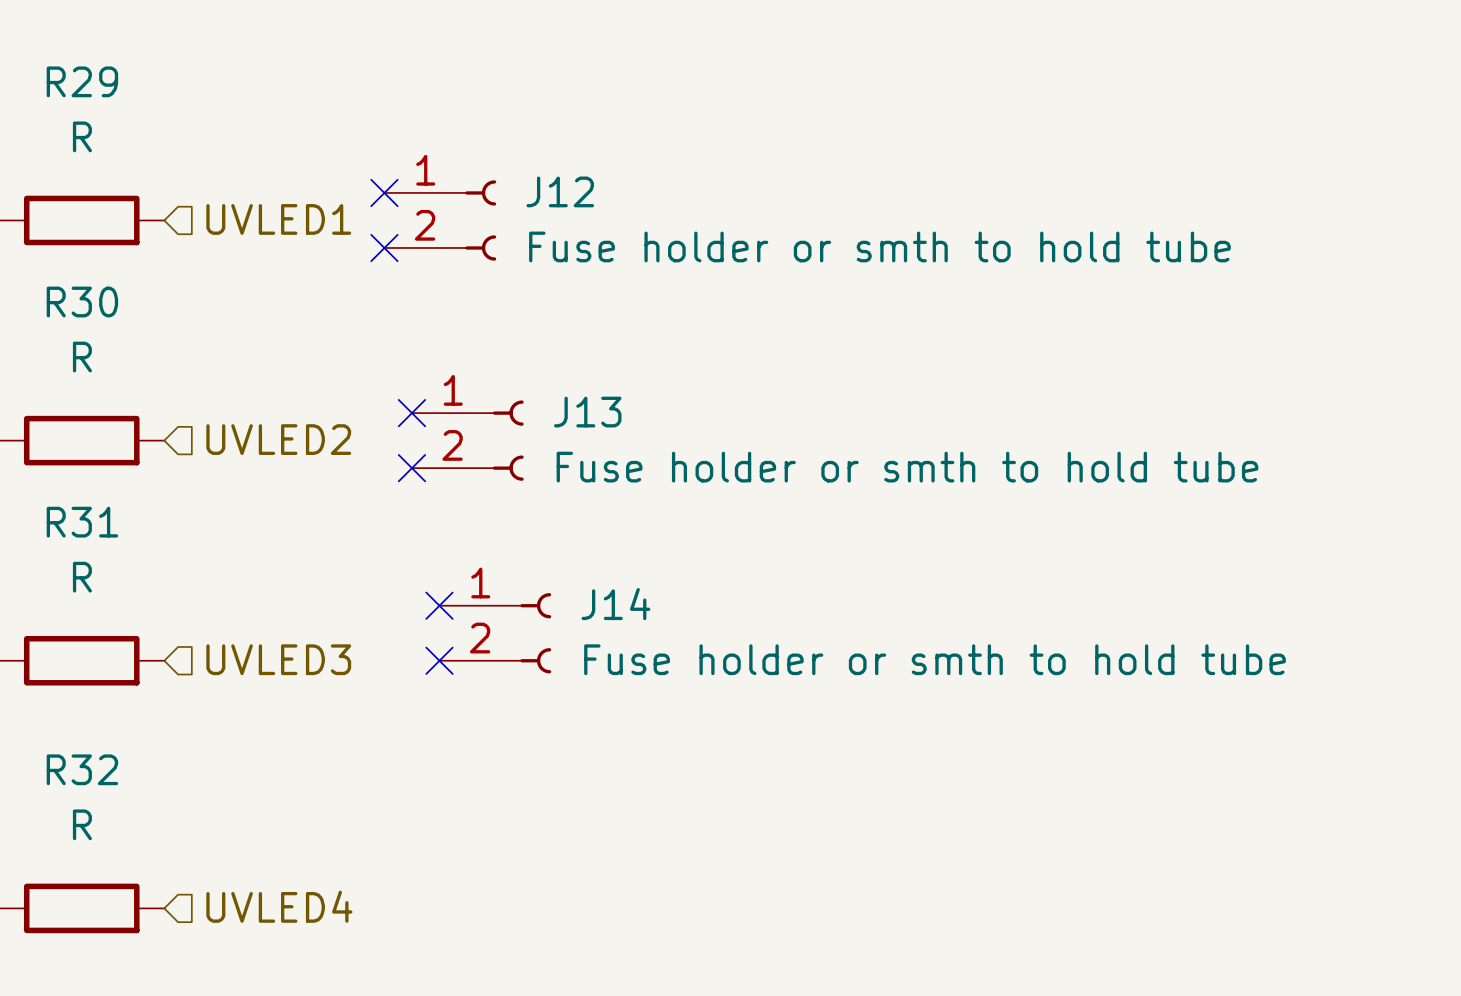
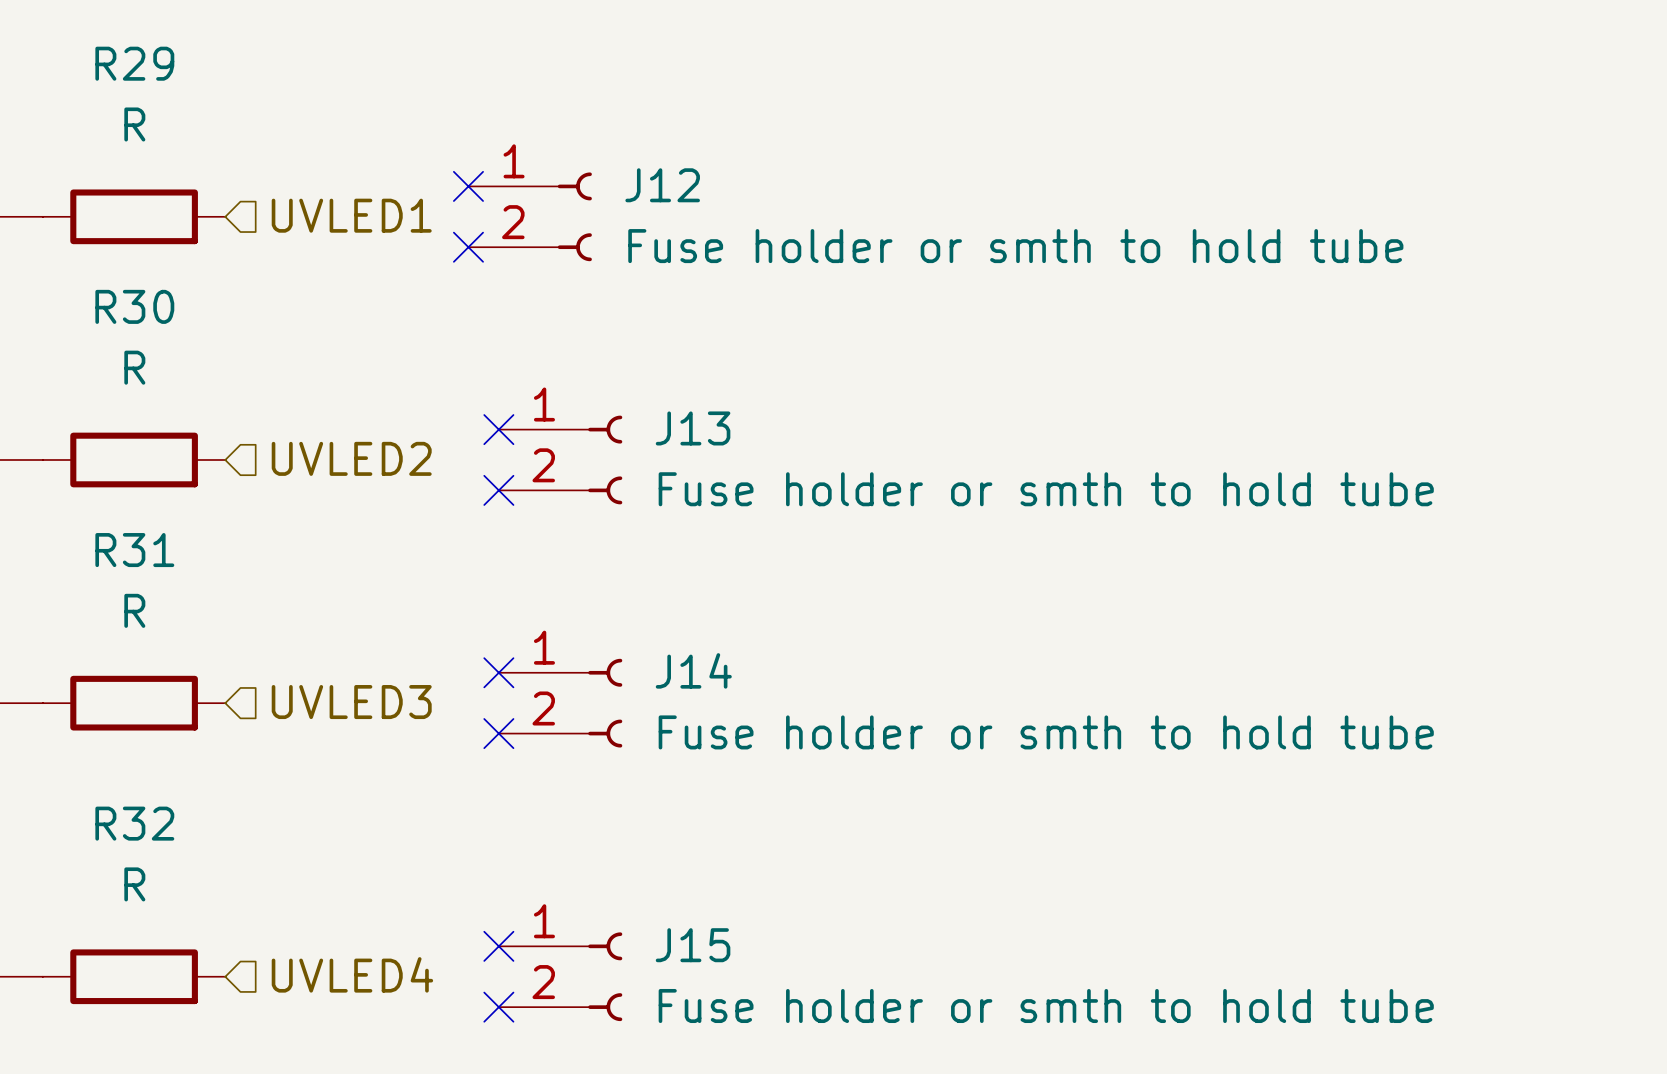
no-connect mark: (439, 605) -> none
no-connect mark: none -> (498, 672)
J14 position: (495, 633) -> (560, 703)
no-connect mark: (439, 660) -> none
no-connect mark: none -> (498, 733)
no-connect mark: none -> (498, 946)
J15: none -> Fuse holder or smth to hold tube (560, 976)
no-connect mark: none -> (498, 1007)

